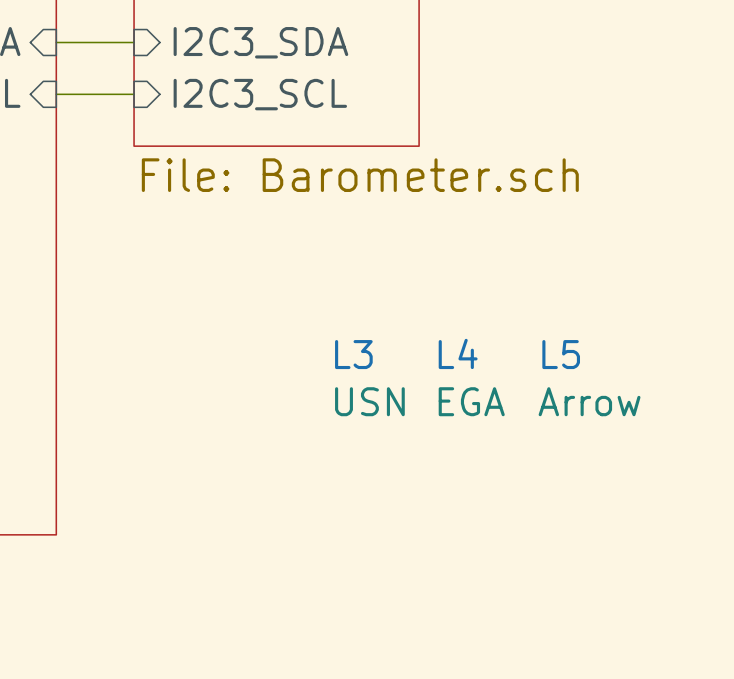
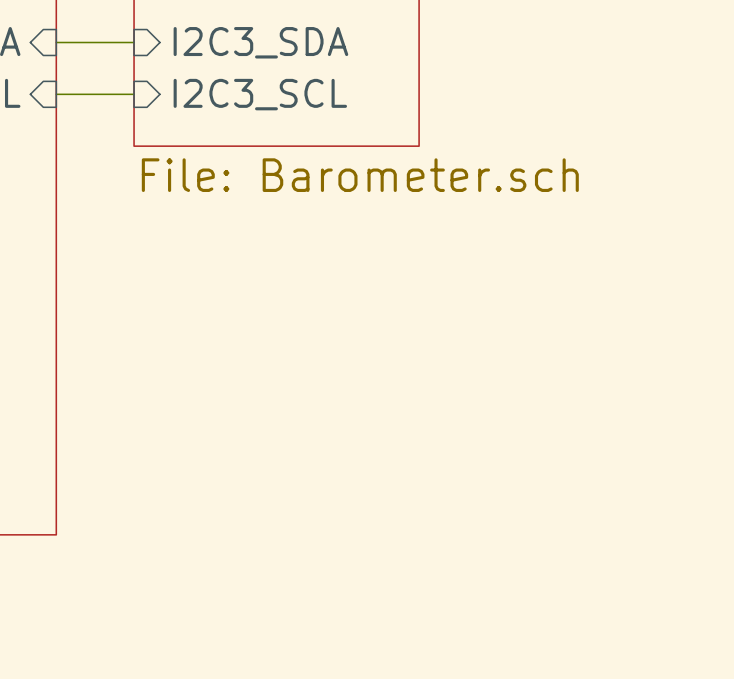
L4: EGA (471, 377) -> none
L3: USN (369, 378) -> none
L5: Arrow (589, 378) -> none

